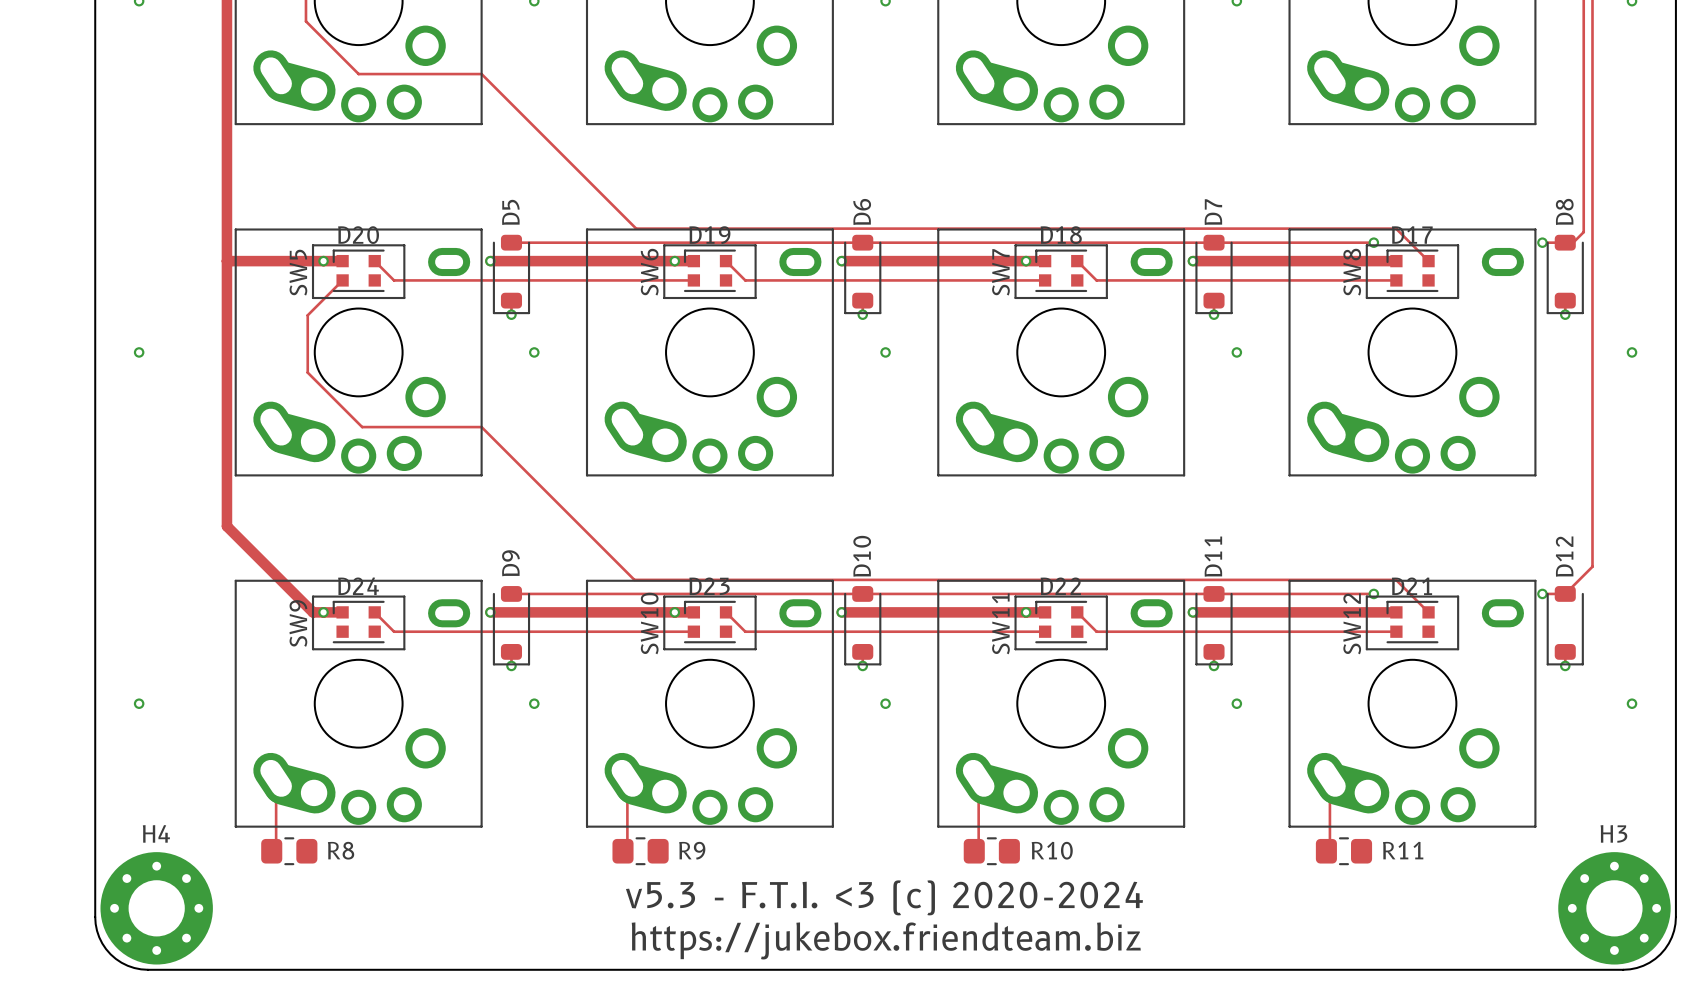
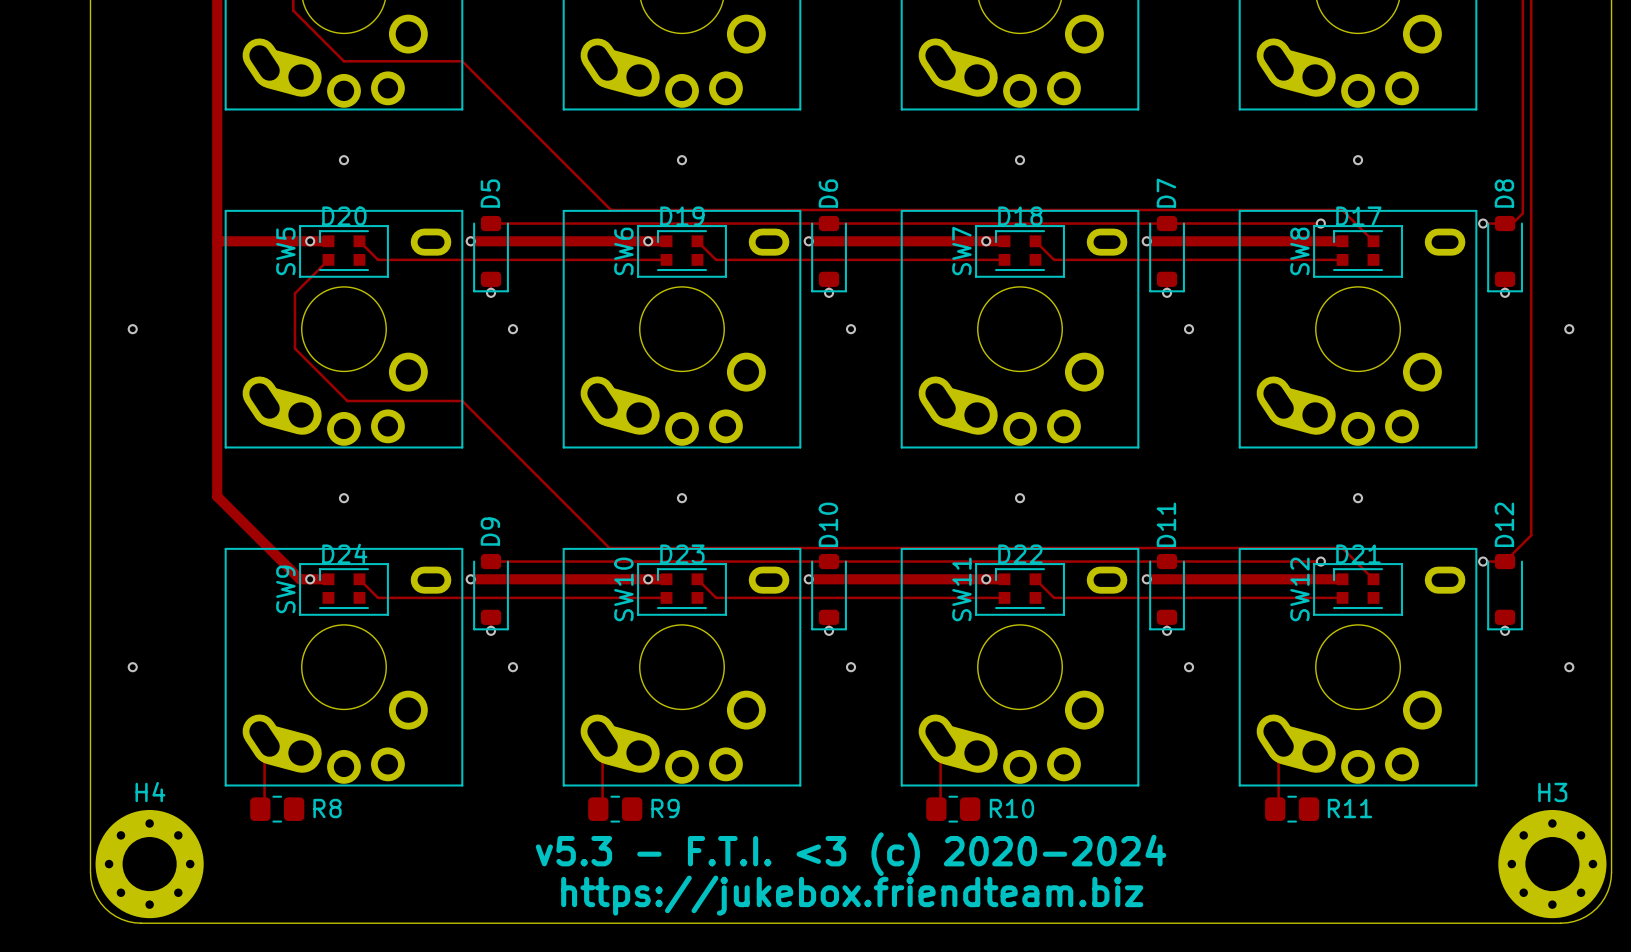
via: none -> (343, 160)
via: none -> (682, 160)
via: none -> (1020, 160)
via: none -> (1358, 160)
via: none -> (343, 498)
via: none -> (682, 498)
via: none -> (1020, 498)
via: none -> (1358, 498)

